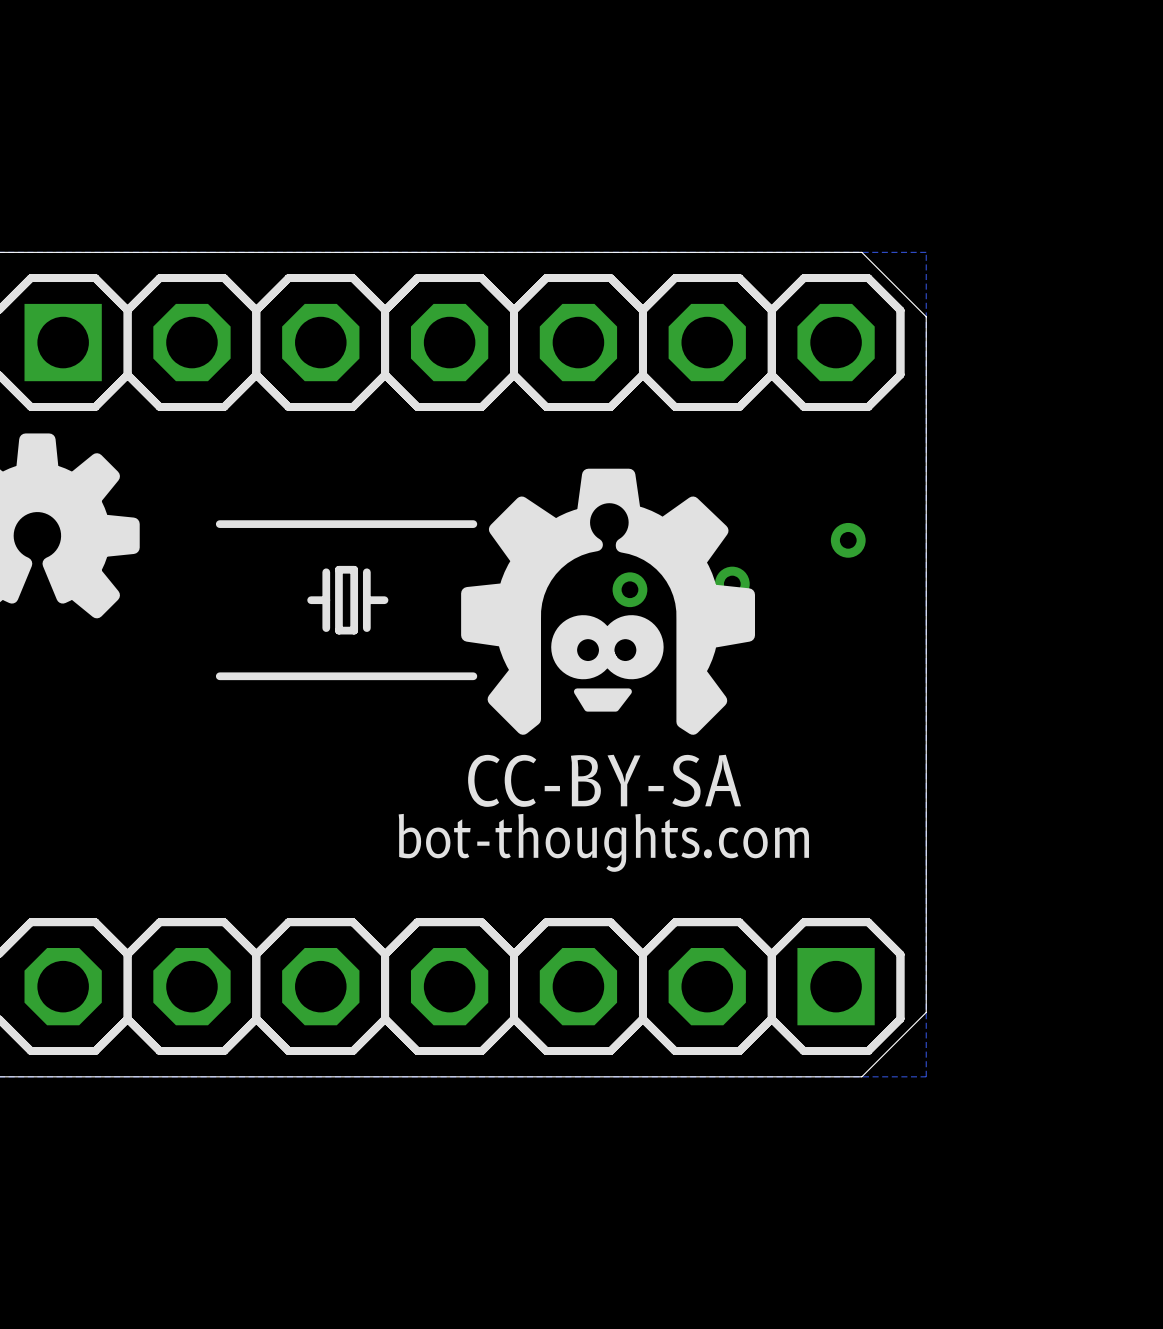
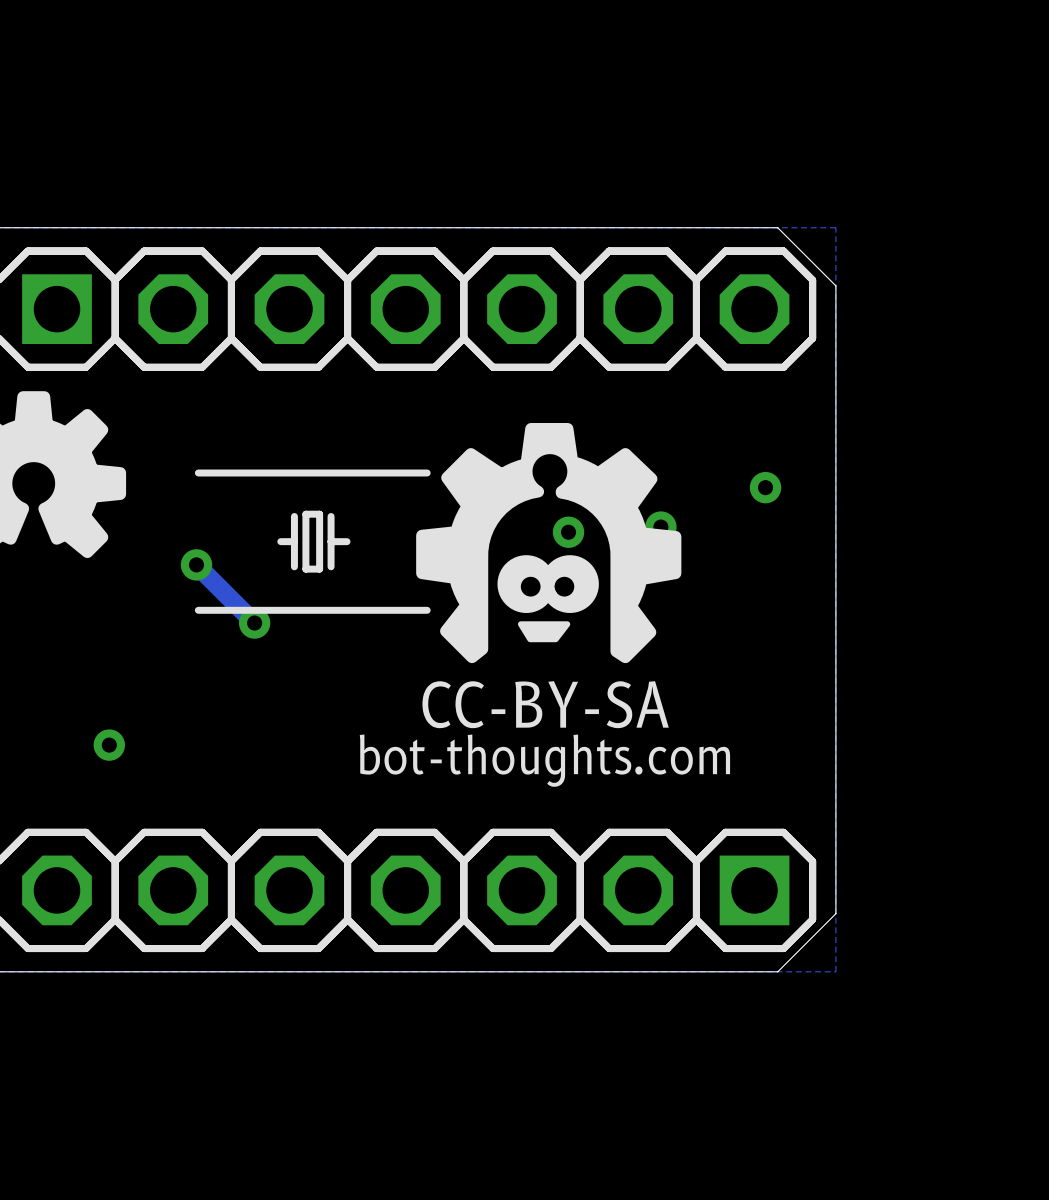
track: none -> (196, 564) (254, 623)
via: none -> (196, 564)
via: none -> (254, 623)
via: none -> (109, 745)

